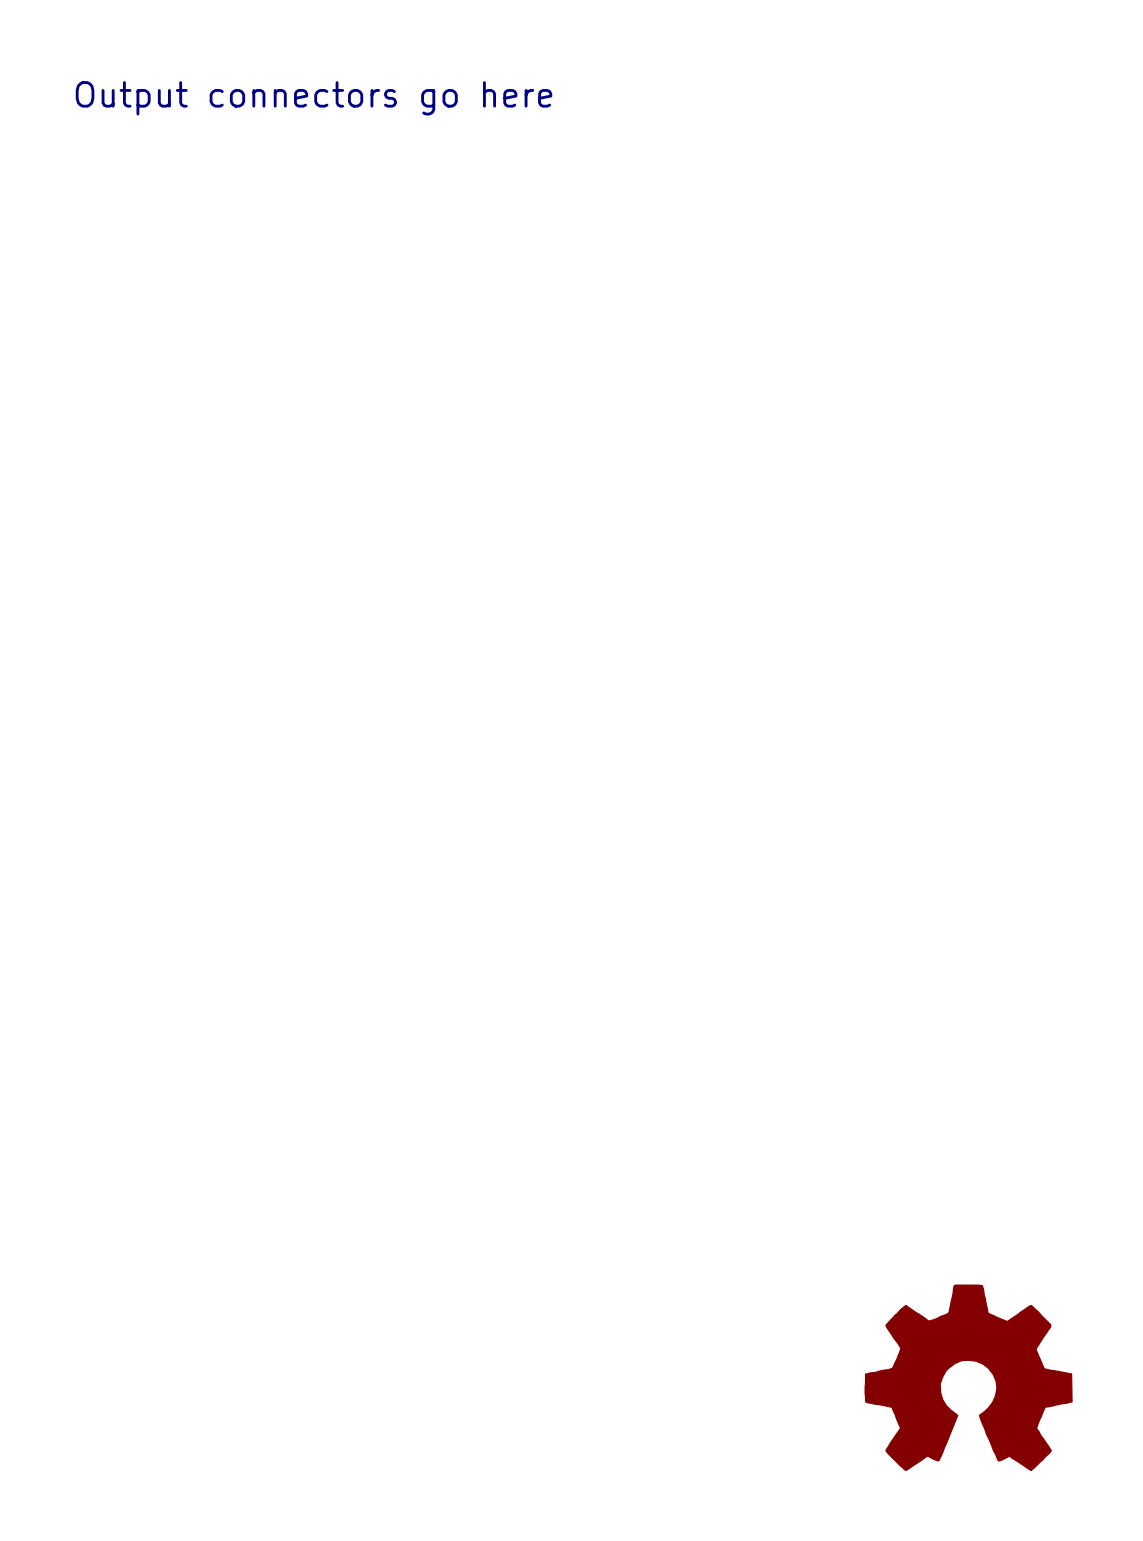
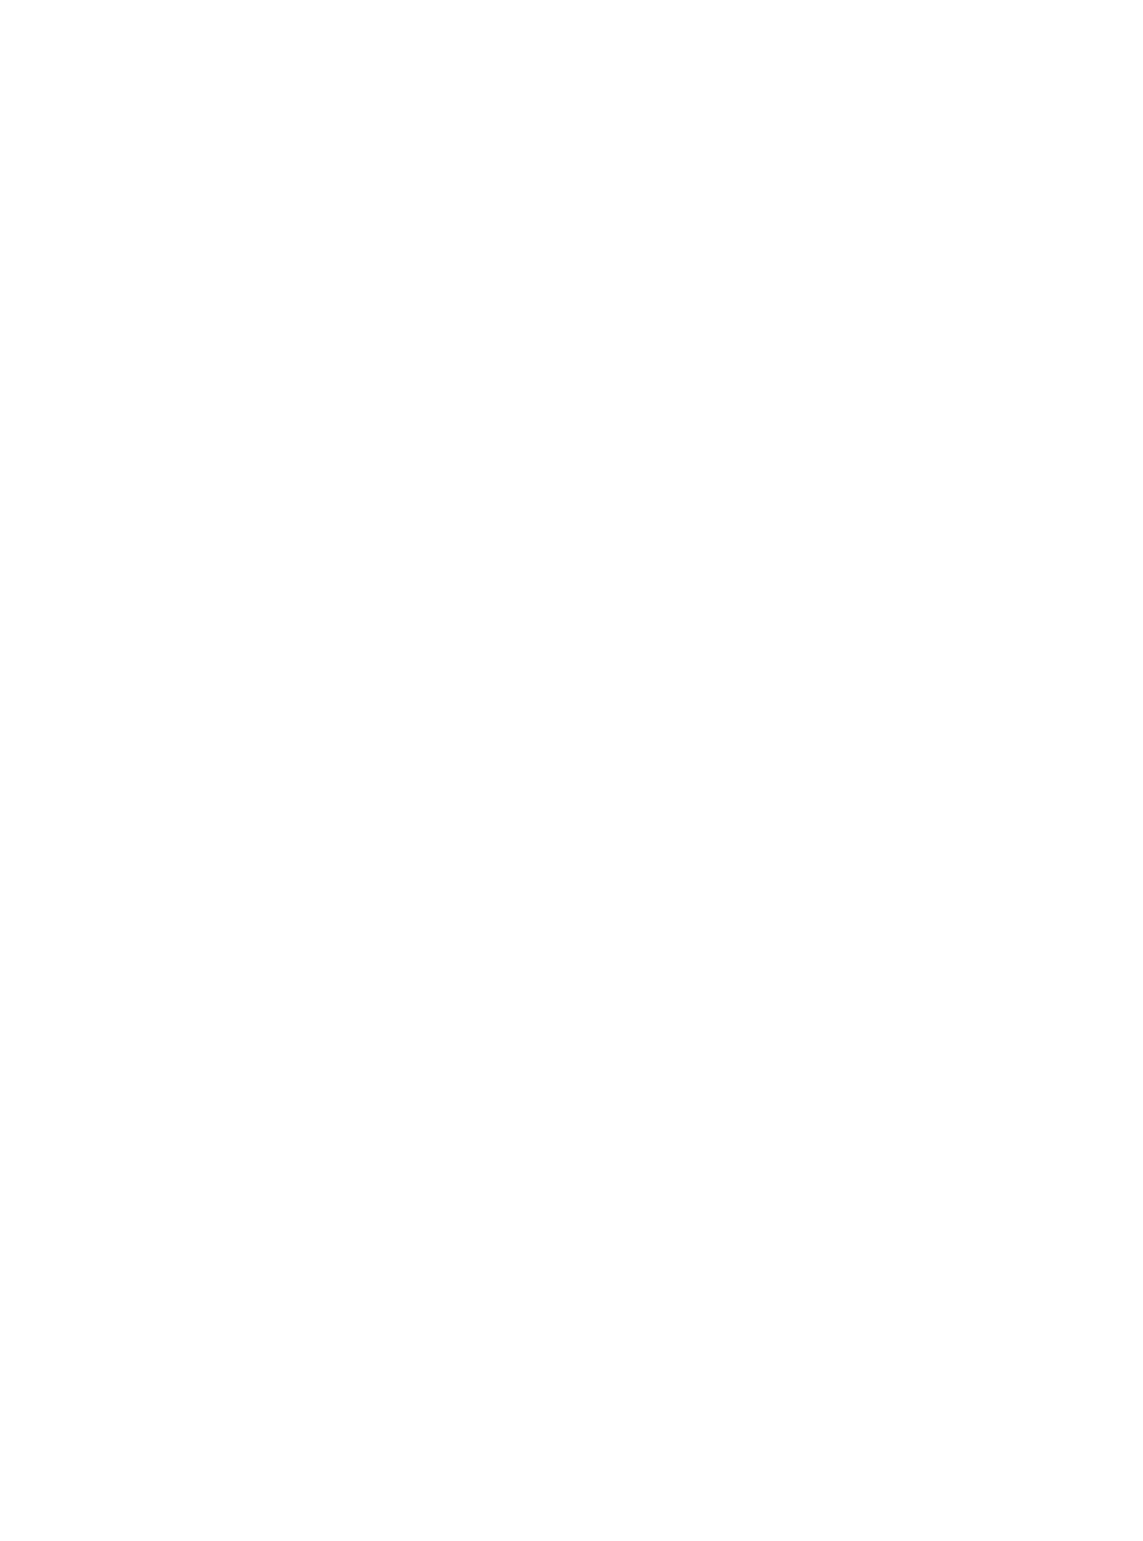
text: Output connectors go here (313, 98) -> none
part: (968, 1377) -> none

